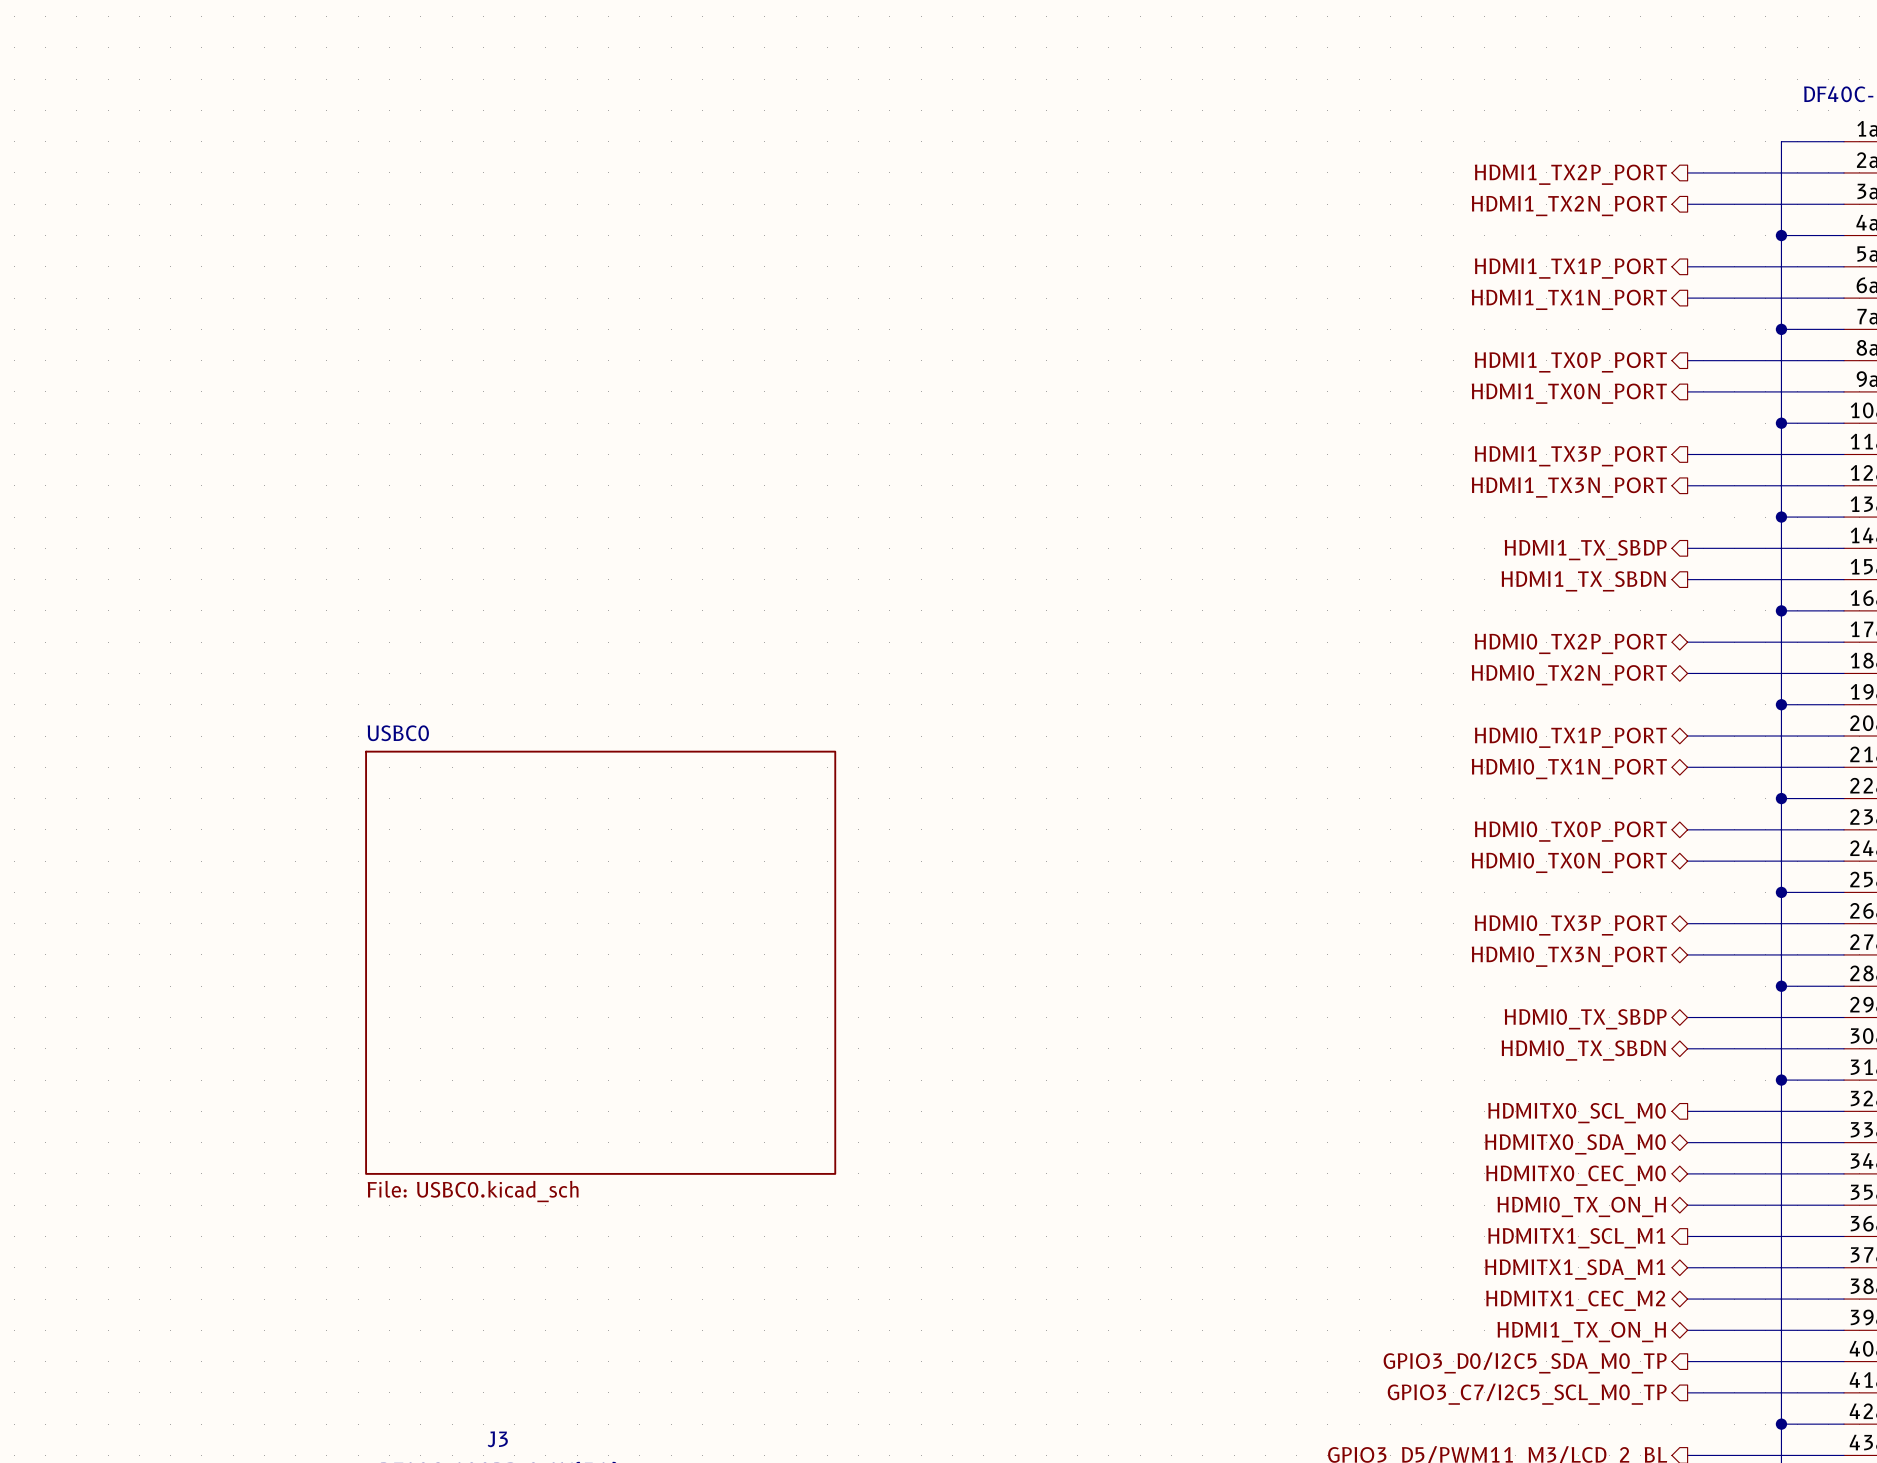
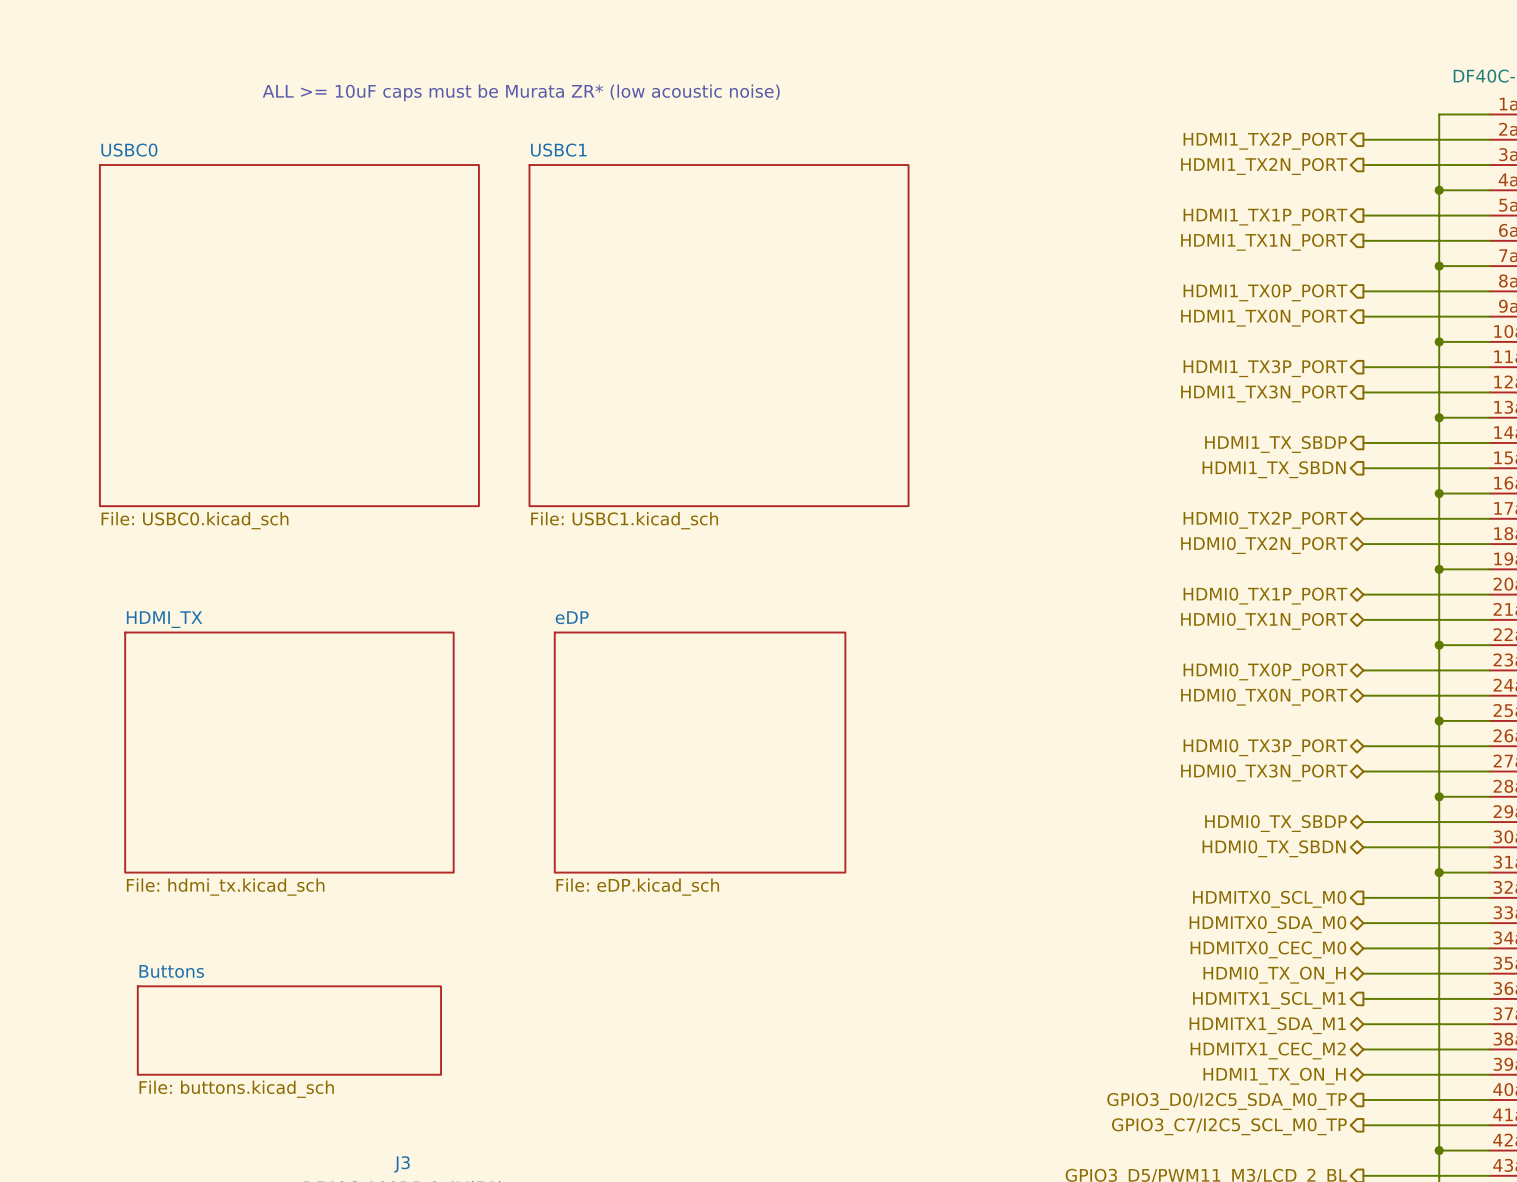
text: none -> ALL >= 10uF caps must be Murata ZR* (low acoustic noise) (521, 92)
sheet USBC1: none -> File: USBC1.kicad_sch (719, 335)
sheet HDMI_TX: none -> File: hdmi_tx.kicad_sch (289, 752)
sheet eDP: none -> File: eDP.kicad_sch (700, 752)
sheet USBC0 position: (600, 962) -> (289, 335)
sheet Buttons: none -> File: buttons.kicad_sch (289, 1030)

